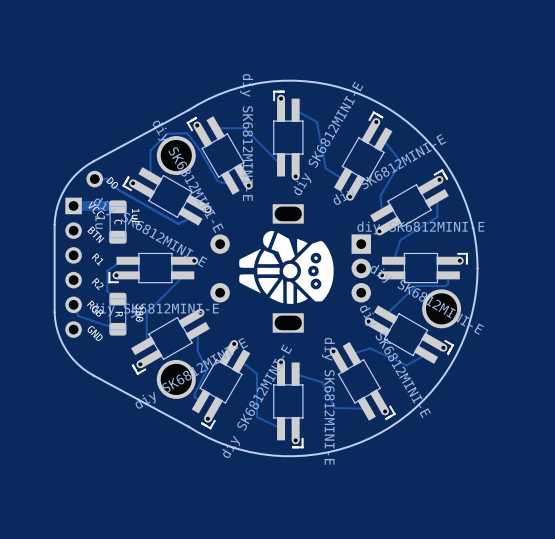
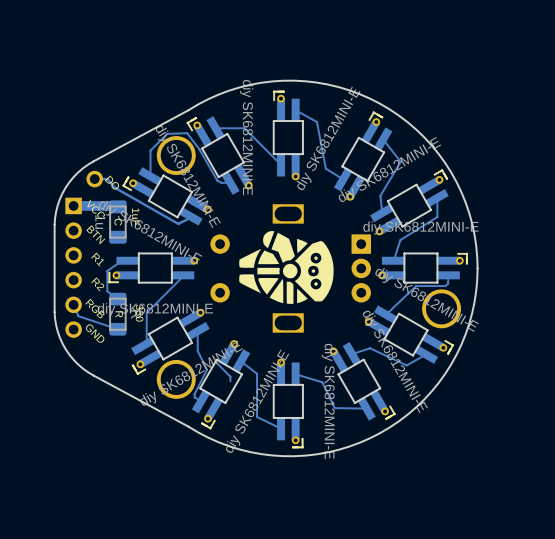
track: none -> (216, 363) (230, 376) (230, 381)

